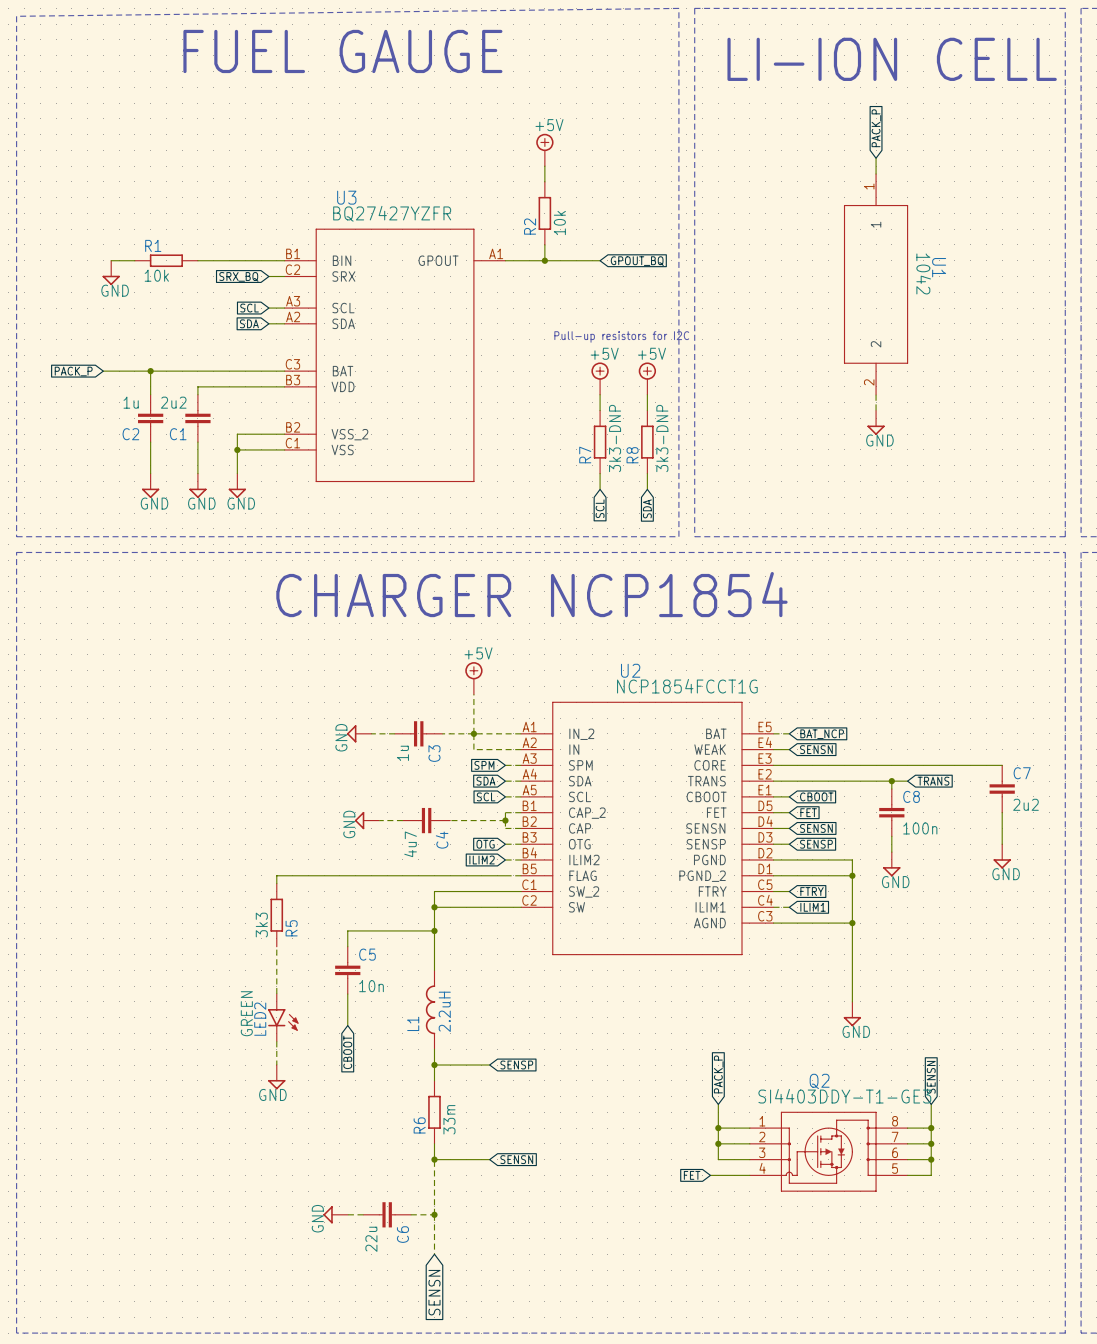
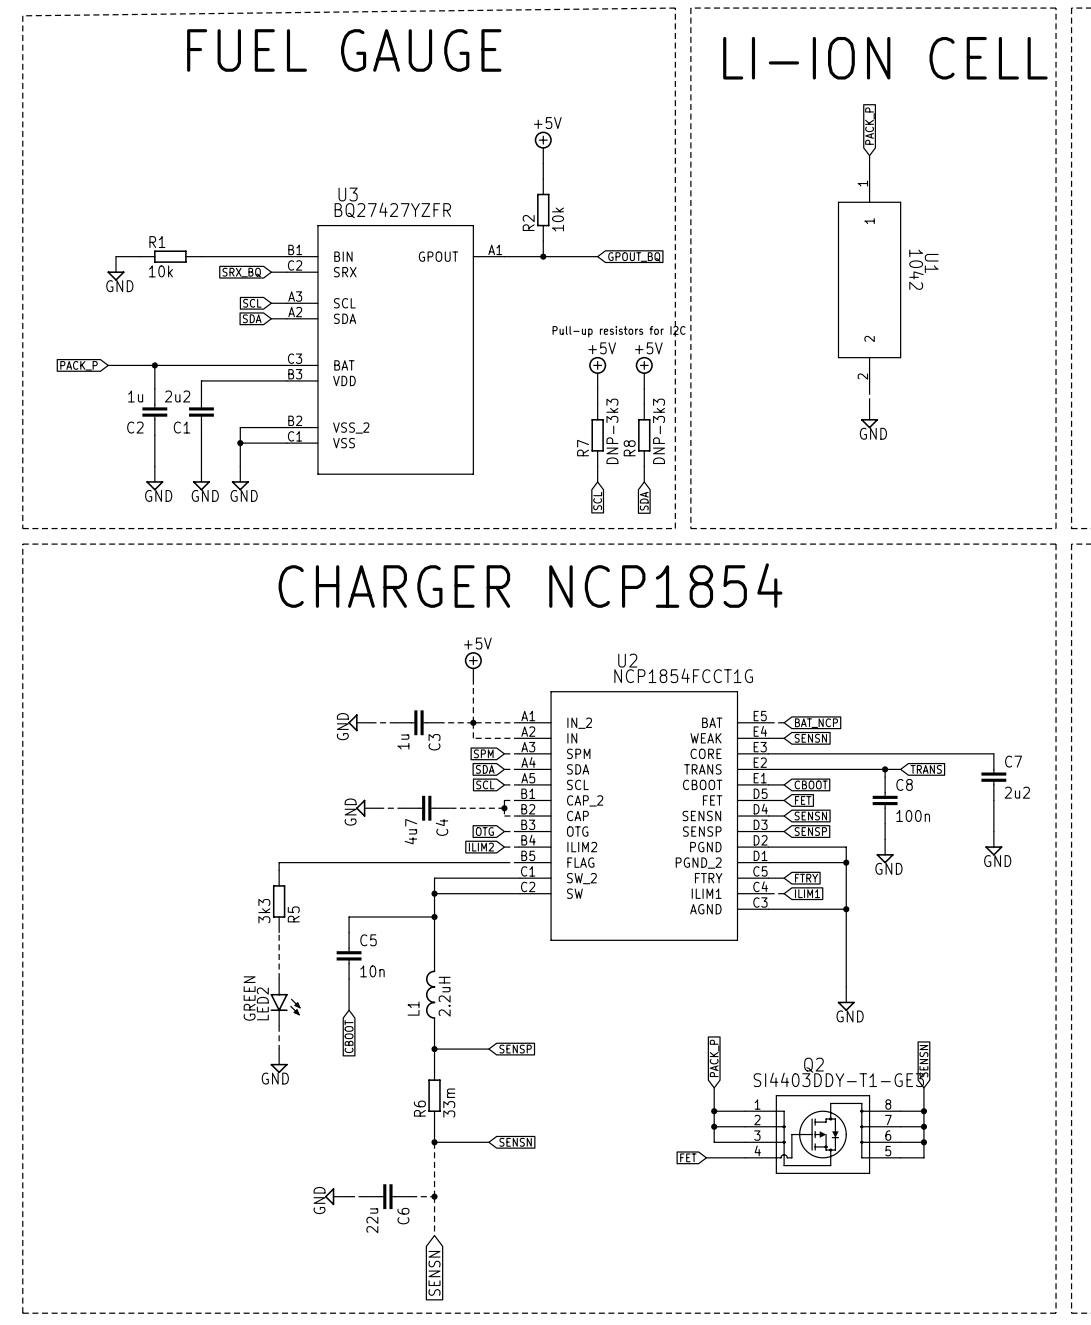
R7 value: 3k3-DNP (615, 438) -> DNP-3k3 (612, 431)
R8 value: 3k3-DNP (662, 438) -> DNP-3k3 (659, 431)

